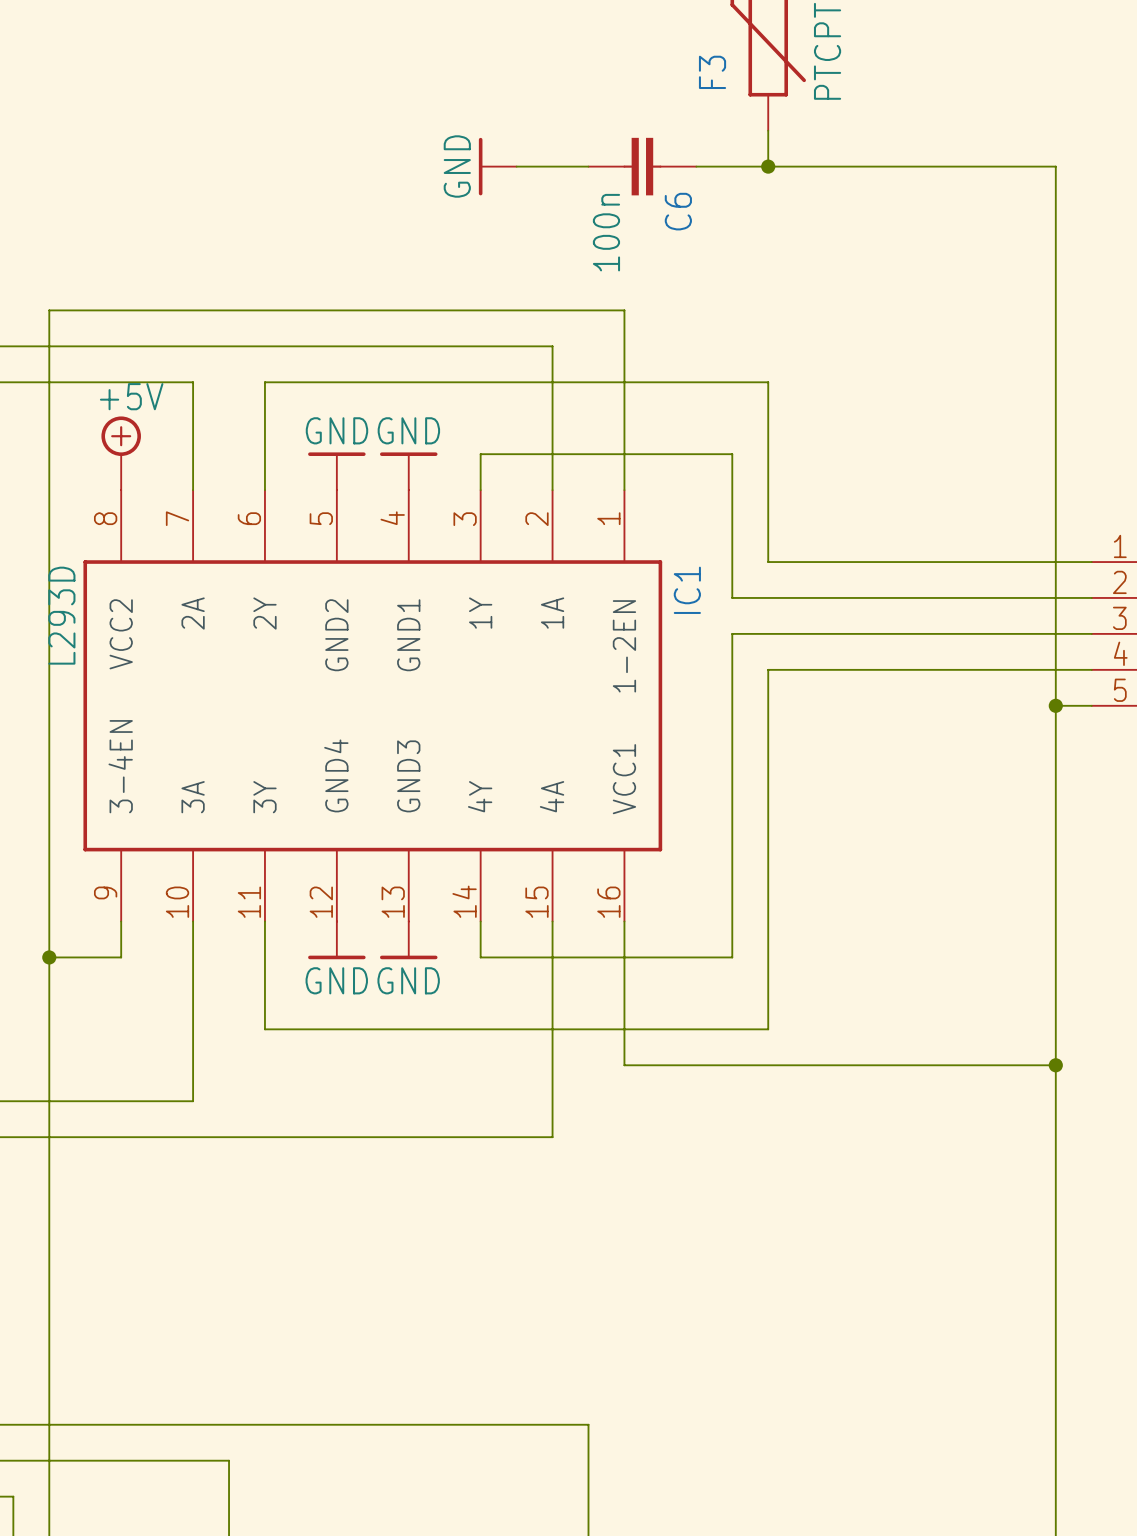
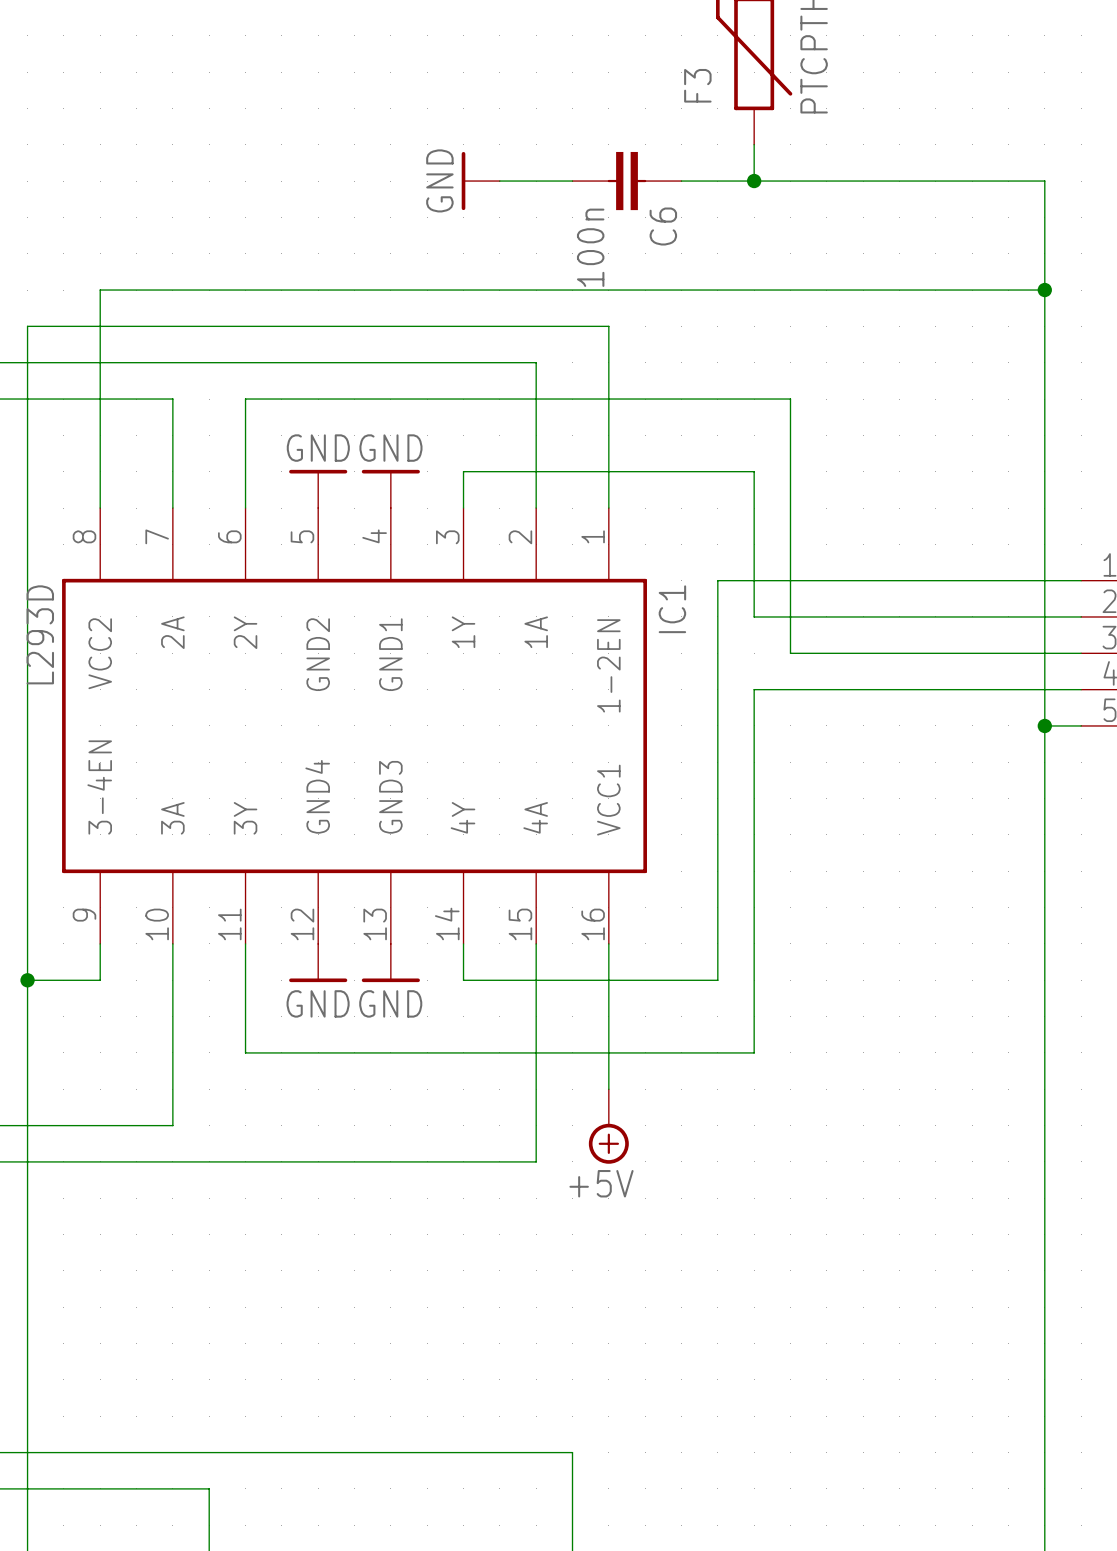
wire: none -> (1044, 290) (100, 290) (100, 508)
junction: none -> (1044, 290)
wire: (768, 382) (768, 454) -> (717, 471) (754, 471)
wire: none -> (754, 399) (790, 399) (790, 653)
power symbol: +5V (121, 453) -> none
wire: (732, 454) (732, 562) -> none
wire: (732, 597) (768, 597) -> (717, 580) (754, 580) (754, 616)
wire: (732, 633) (804, 633) -> (717, 653) (717, 616)
wire: (624, 1065) (1055, 1065) -> none
junction: (1055, 1065) -> none
power symbol: none -> +5V (608, 1126)

